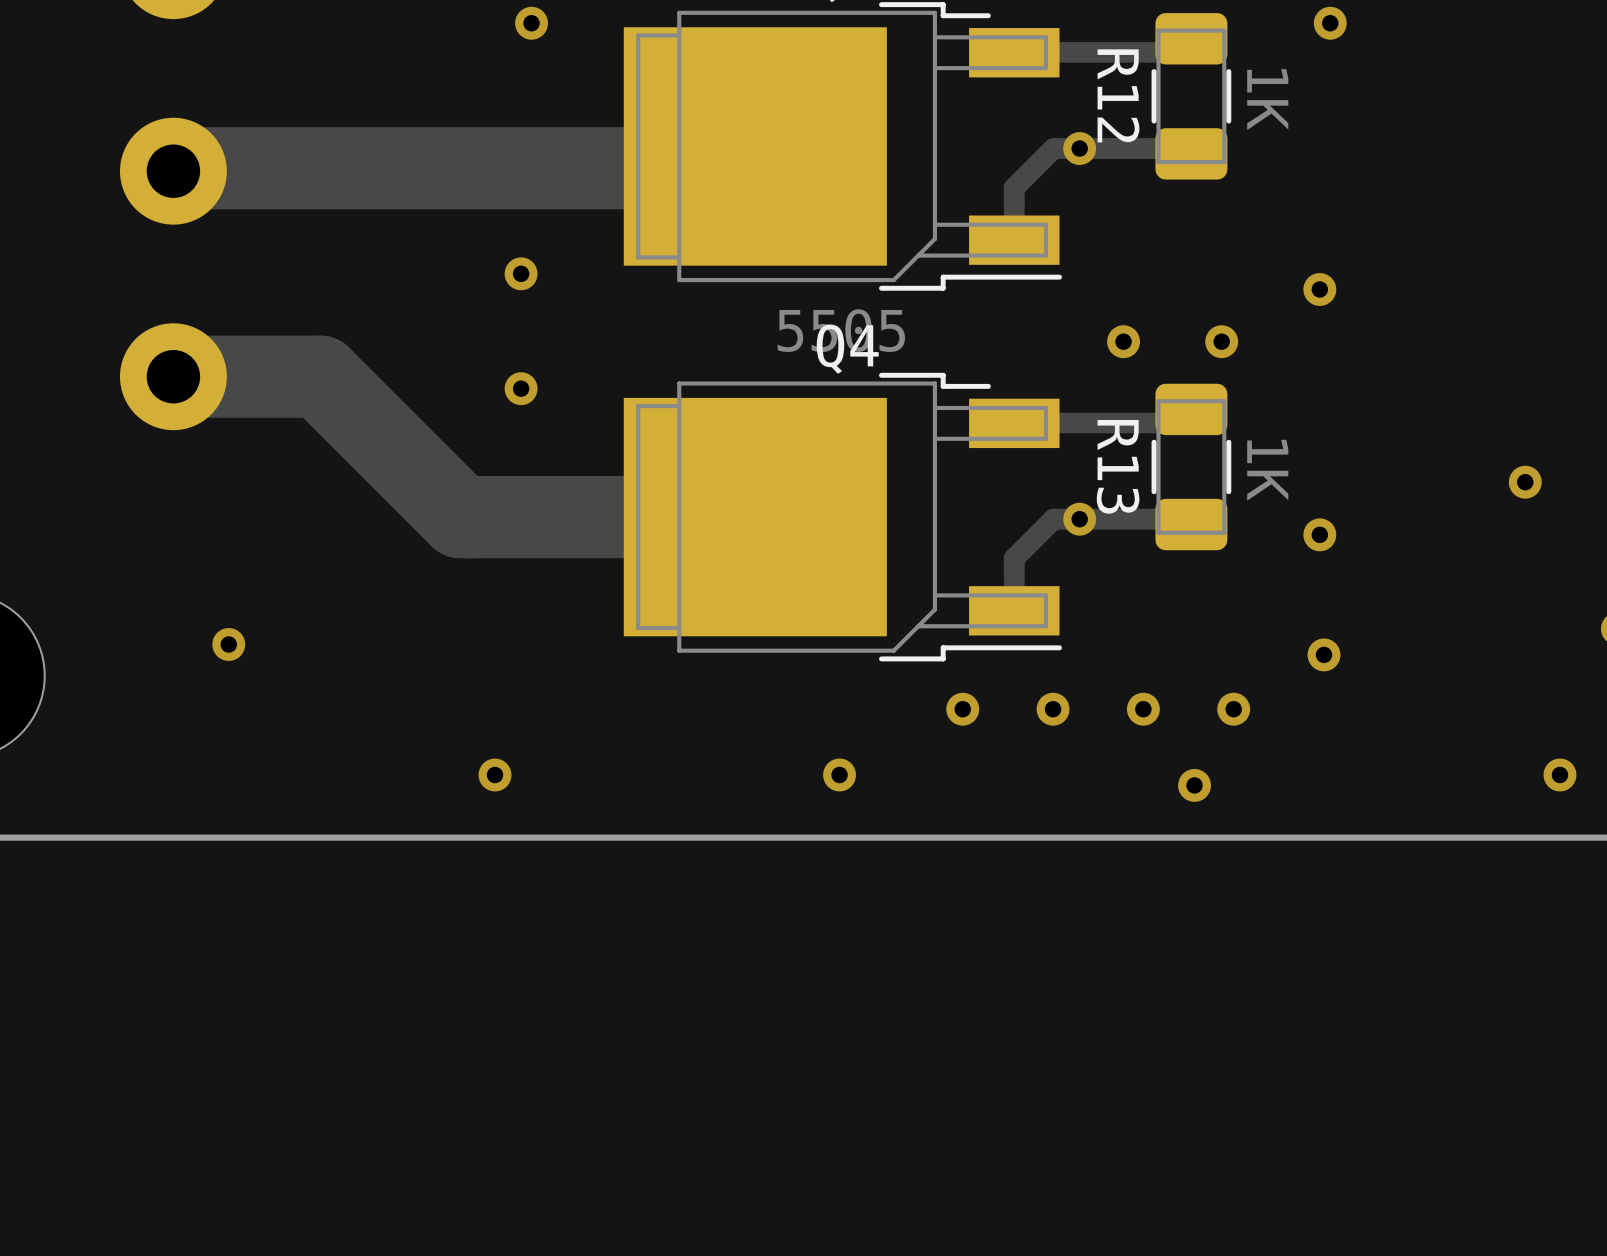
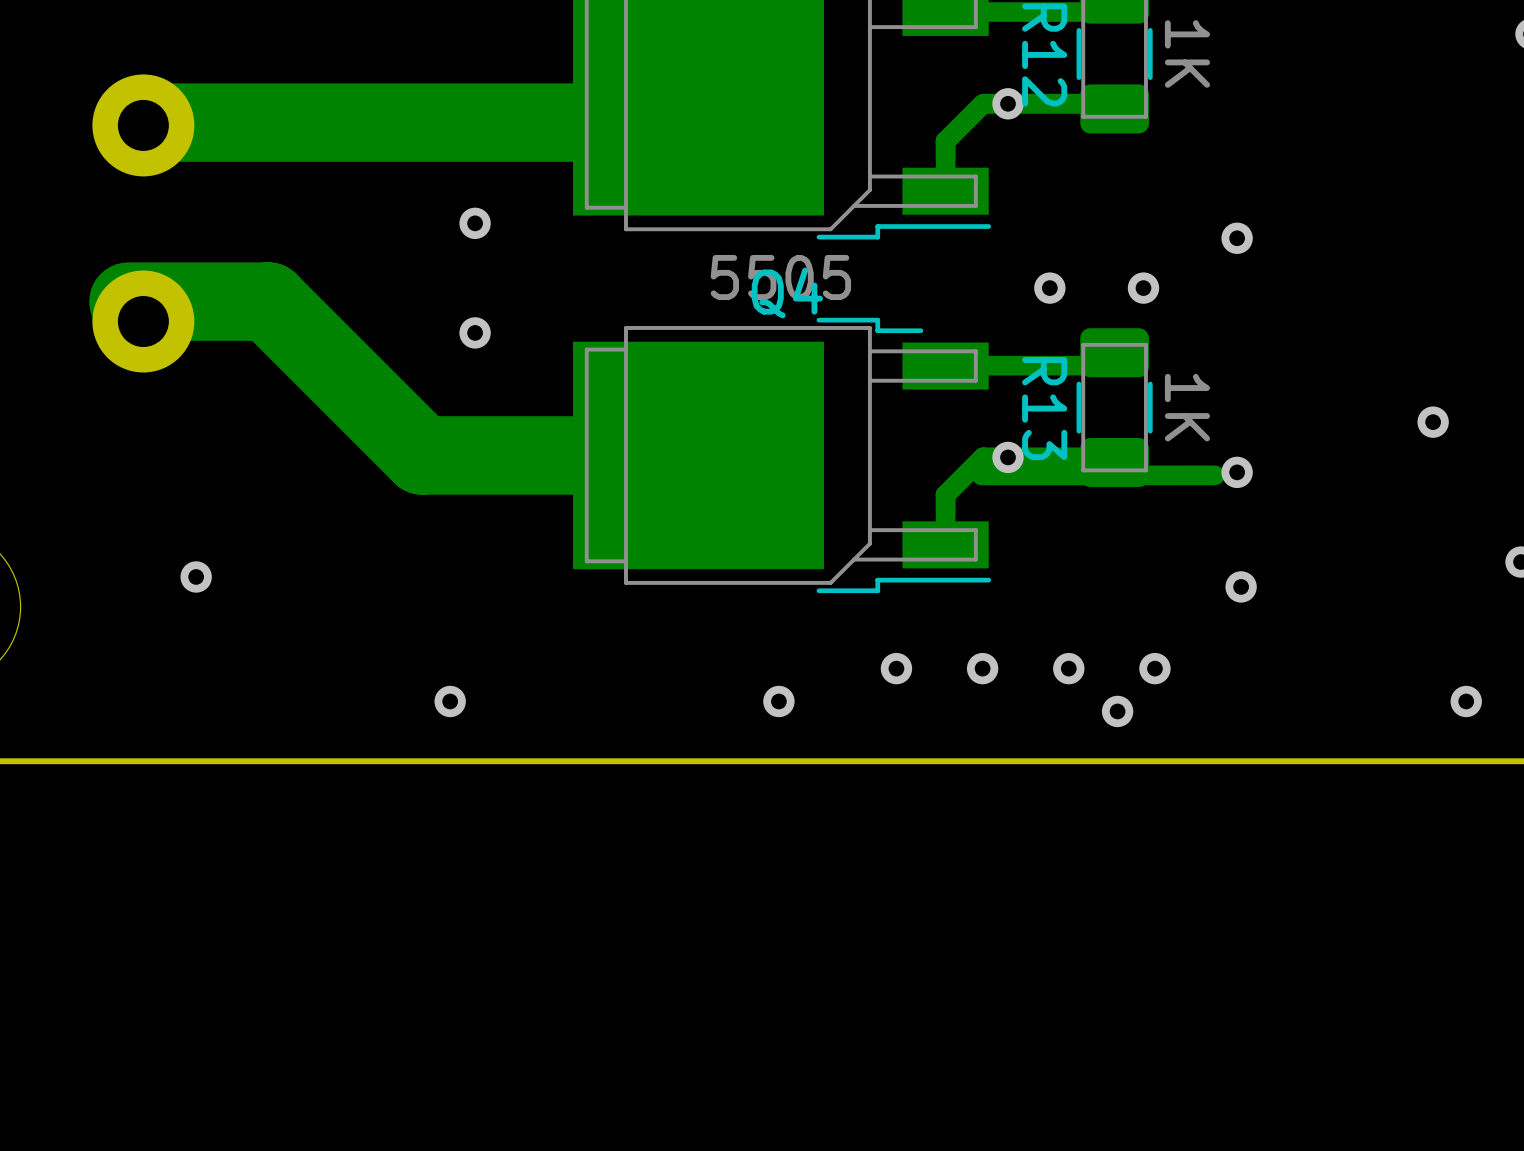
track: (173, 376) (320, 376) (460, 517) (465, 517) -> (128, 301) (268, 301) (422, 455)
track: none -> (1215, 475) (981, 475)
via position: (962, 709) -> (896, 668)
via position: (1053, 709) -> (982, 668)
via position: (1143, 709) -> (1068, 668)
via position: (1233, 709) -> (1154, 668)

